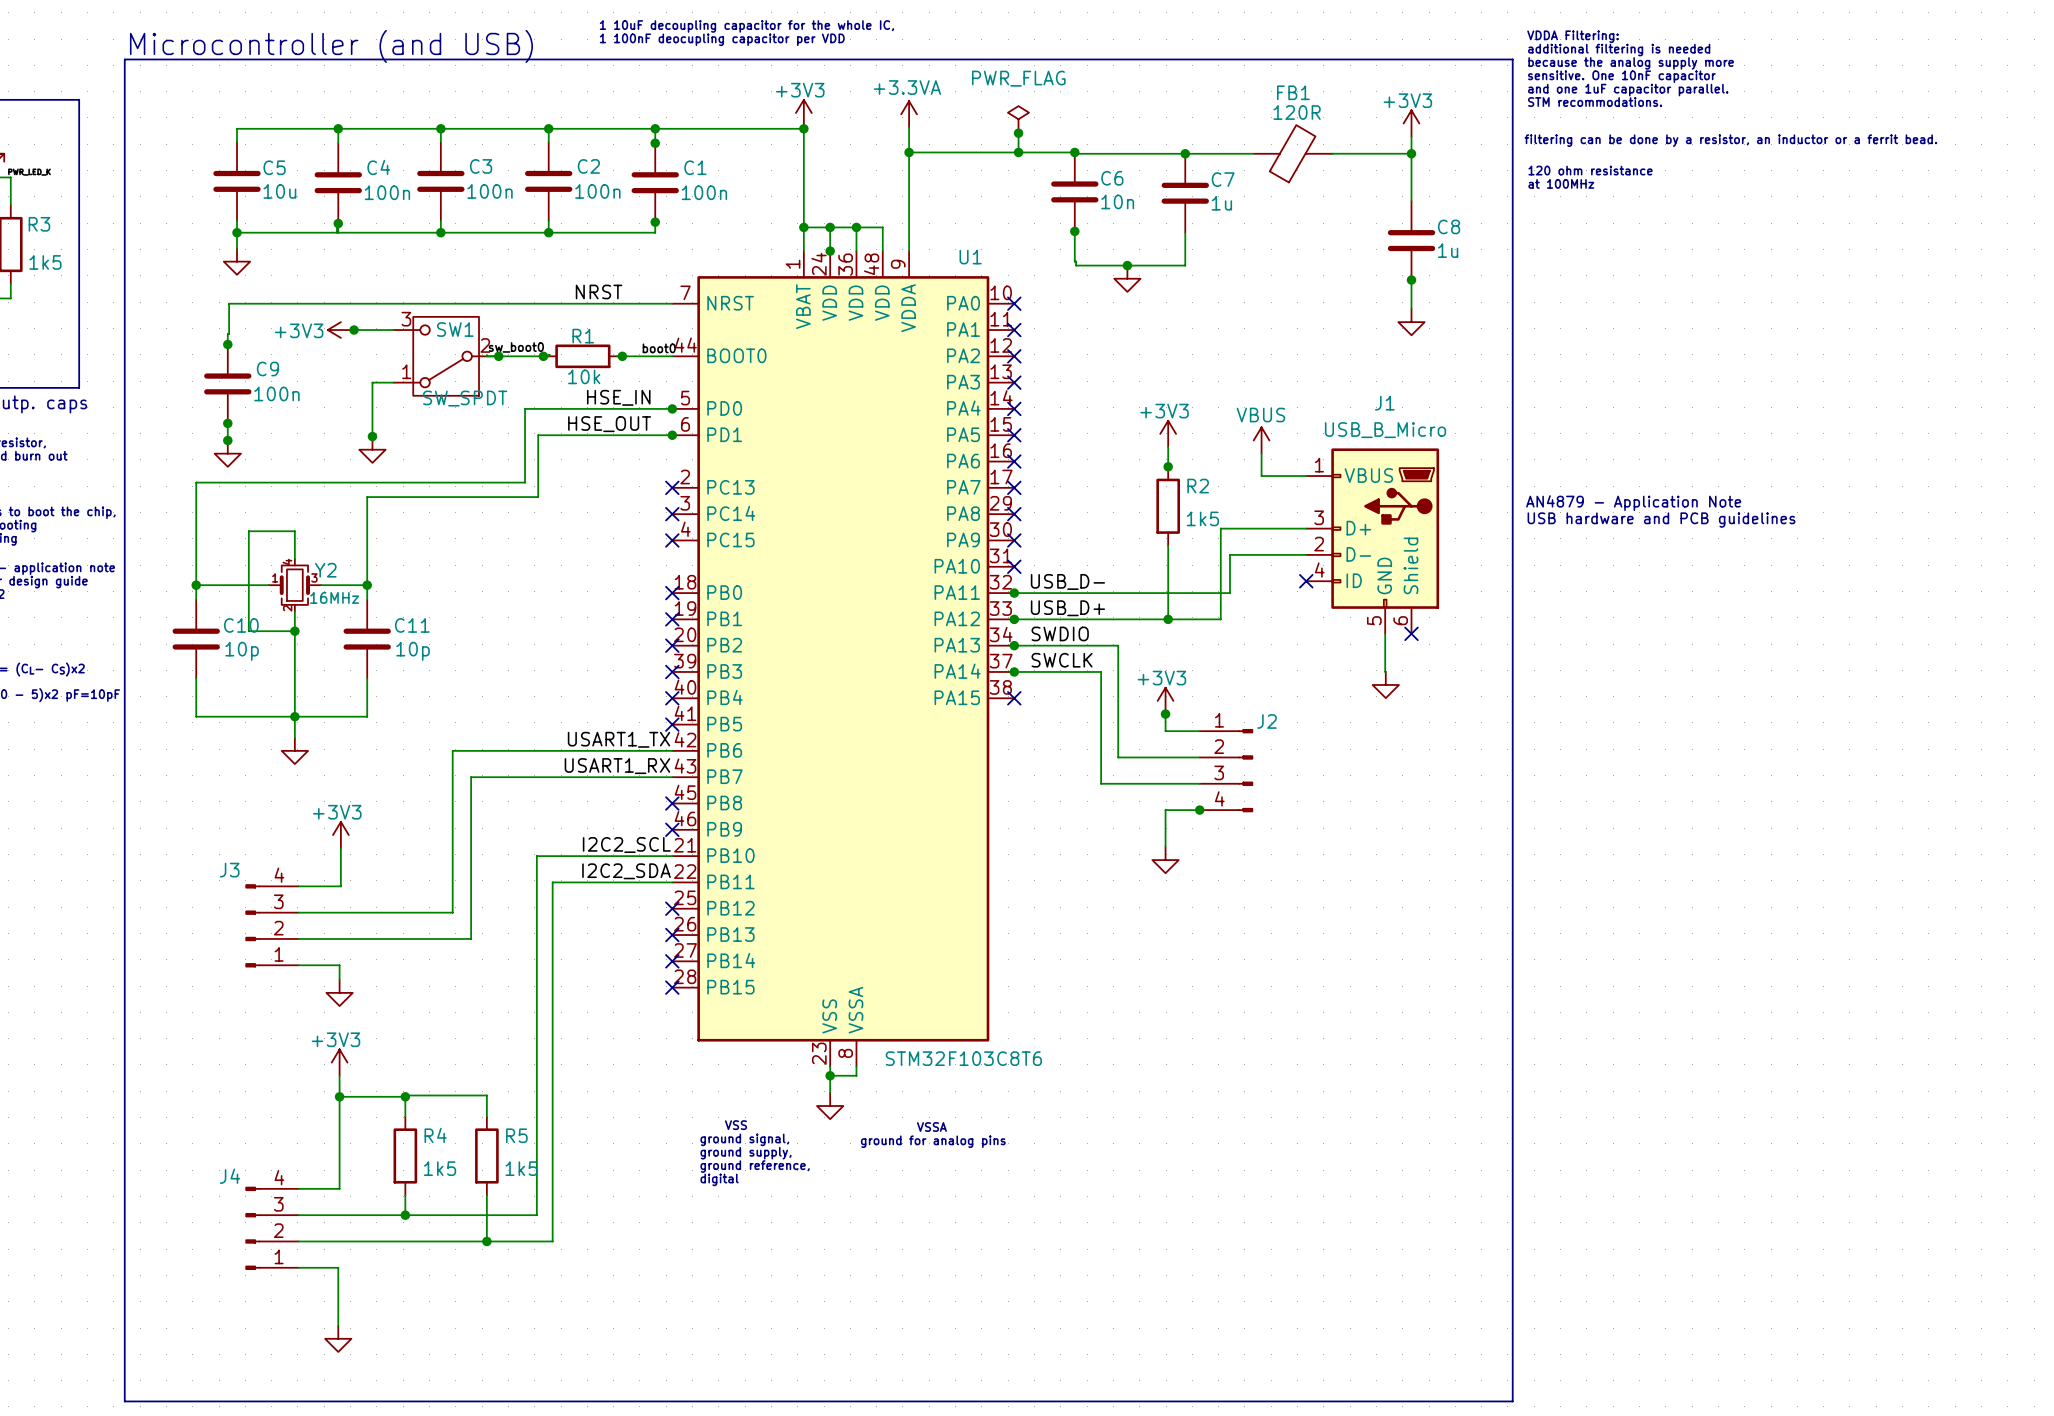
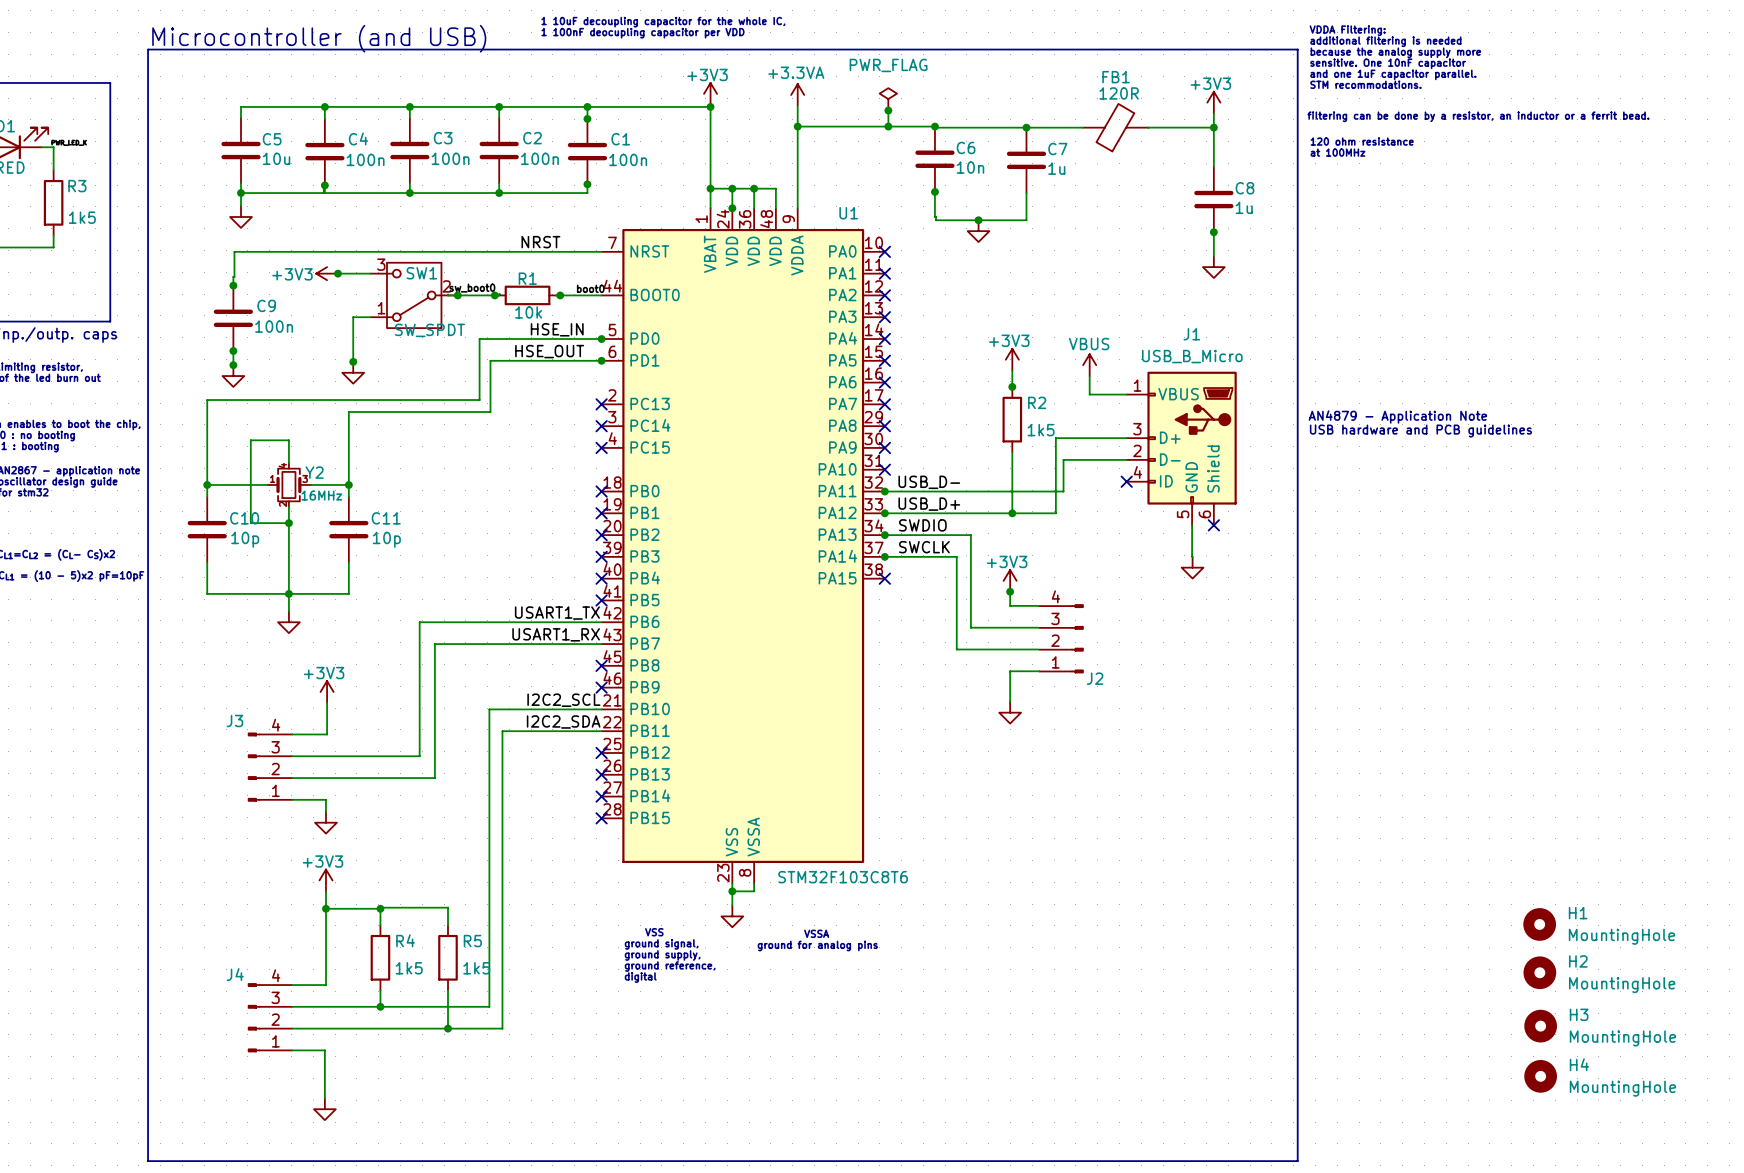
J2 flip: as is (1245, 770) -> up-down (1077, 638)
junction: (1199, 810) -> none
H1: none -> MountingHole (1539, 924)
H2: none -> MountingHole (1539, 972)
H3: none -> MountingHole (1540, 1026)
H4: none -> MountingHole (1540, 1076)

